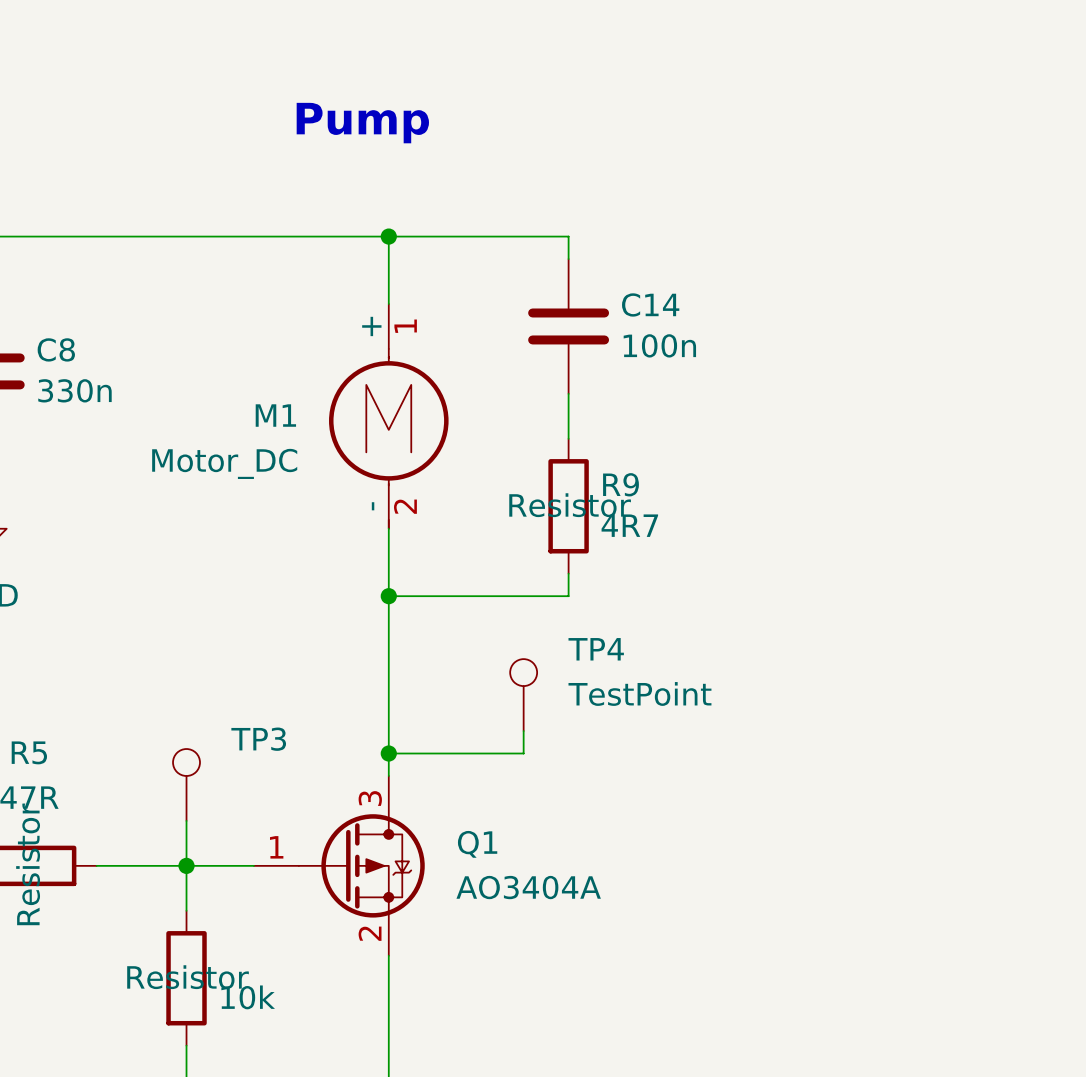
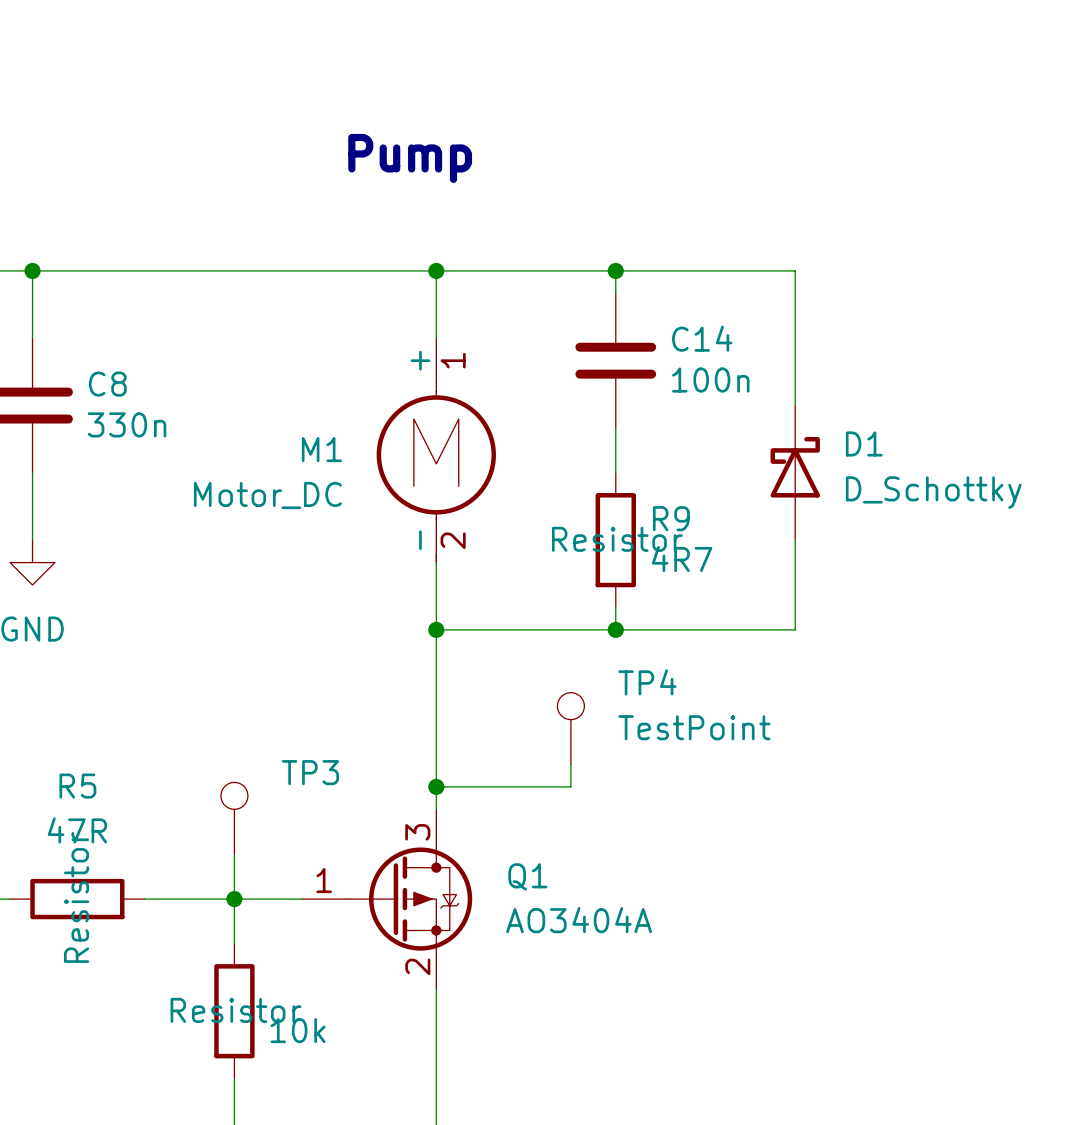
wire: none -> (615, 270) (795, 270) (795, 405)
junction: none -> (615, 270)
D1: none -> D_Schottky (795, 472)
wire: none -> (795, 540) (795, 629) (615, 629)
junction: none -> (615, 629)

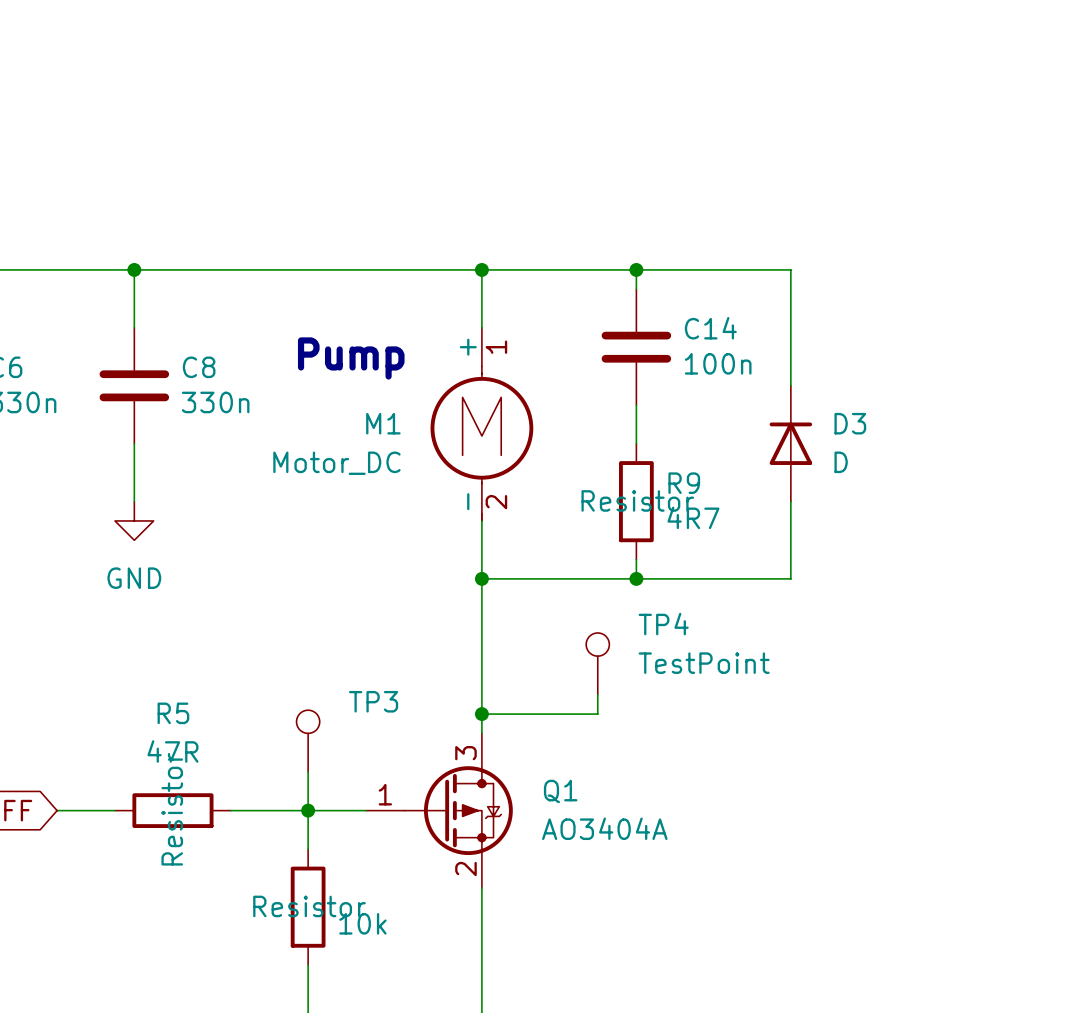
text position: Pump (410, 158) -> Pump (351, 358)
D1: D_Schottky (795, 472) -> none
D3: none -> D (790, 443)

